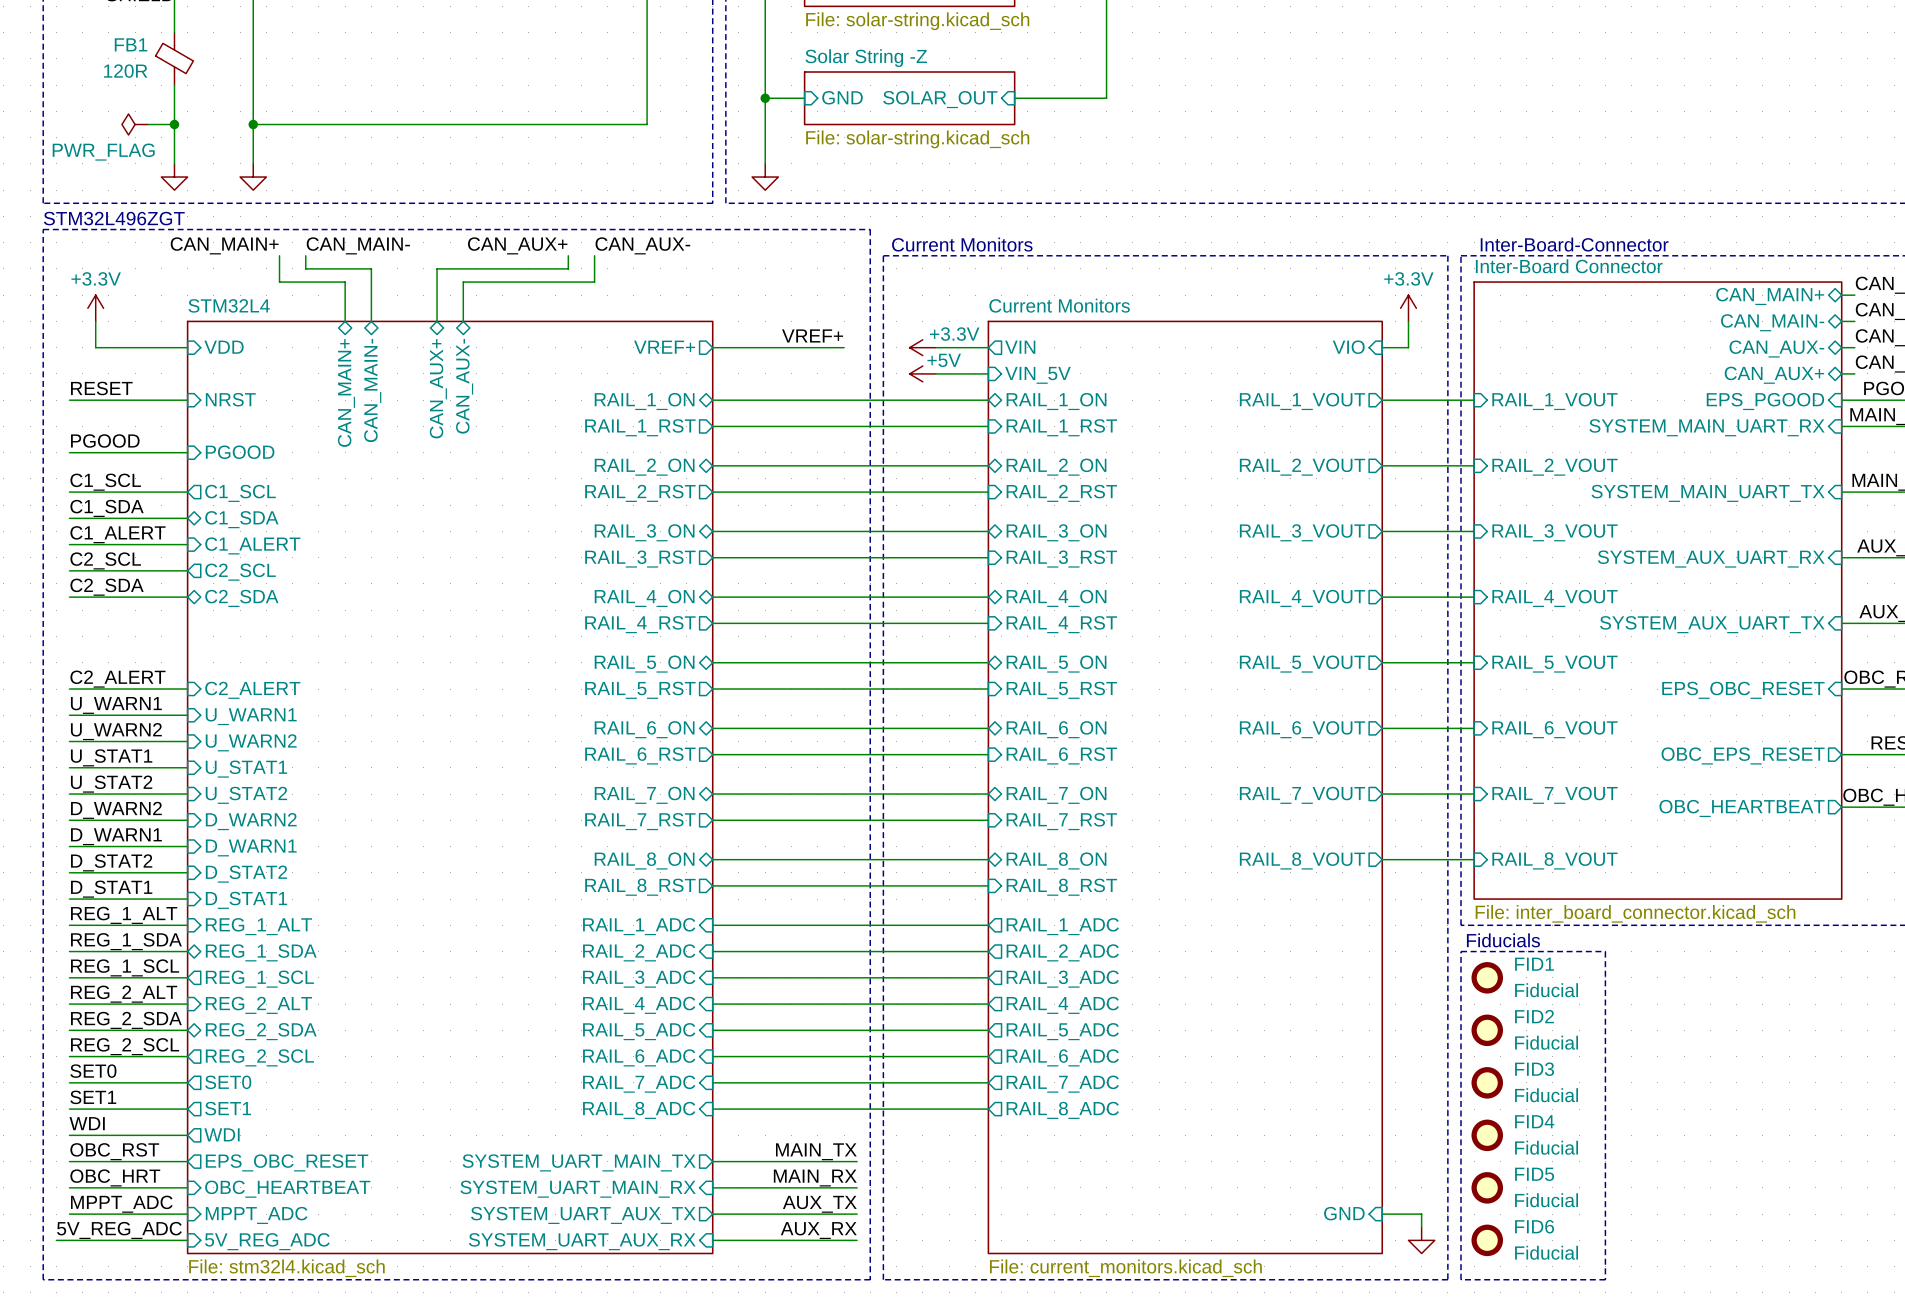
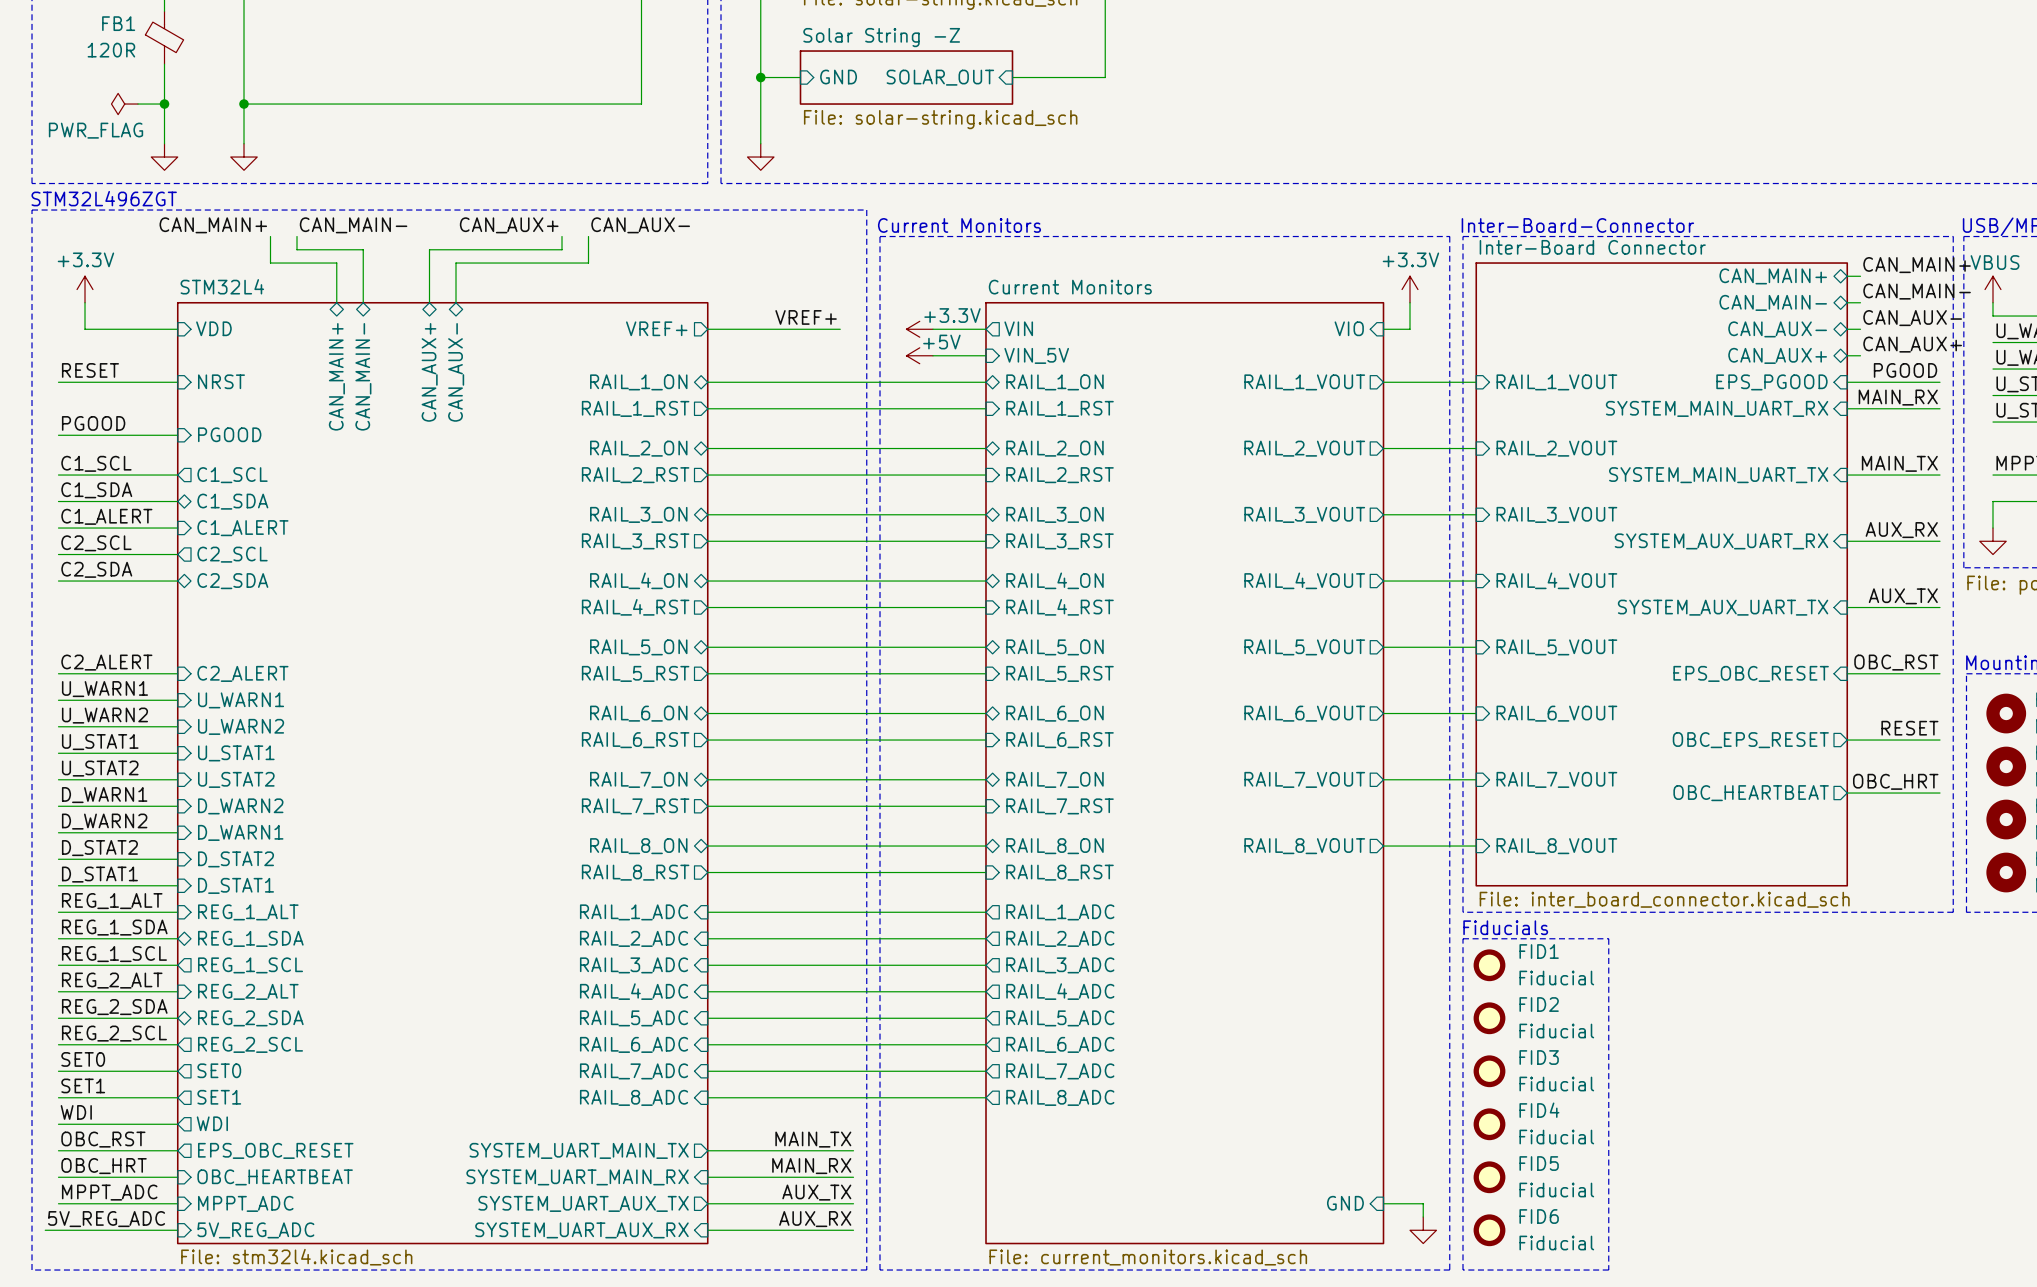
label: D_WARN2 (116, 810) -> D_WARN1 (104, 795)
label: D_WARN1 (116, 836) -> D_WARN2 (104, 821)

